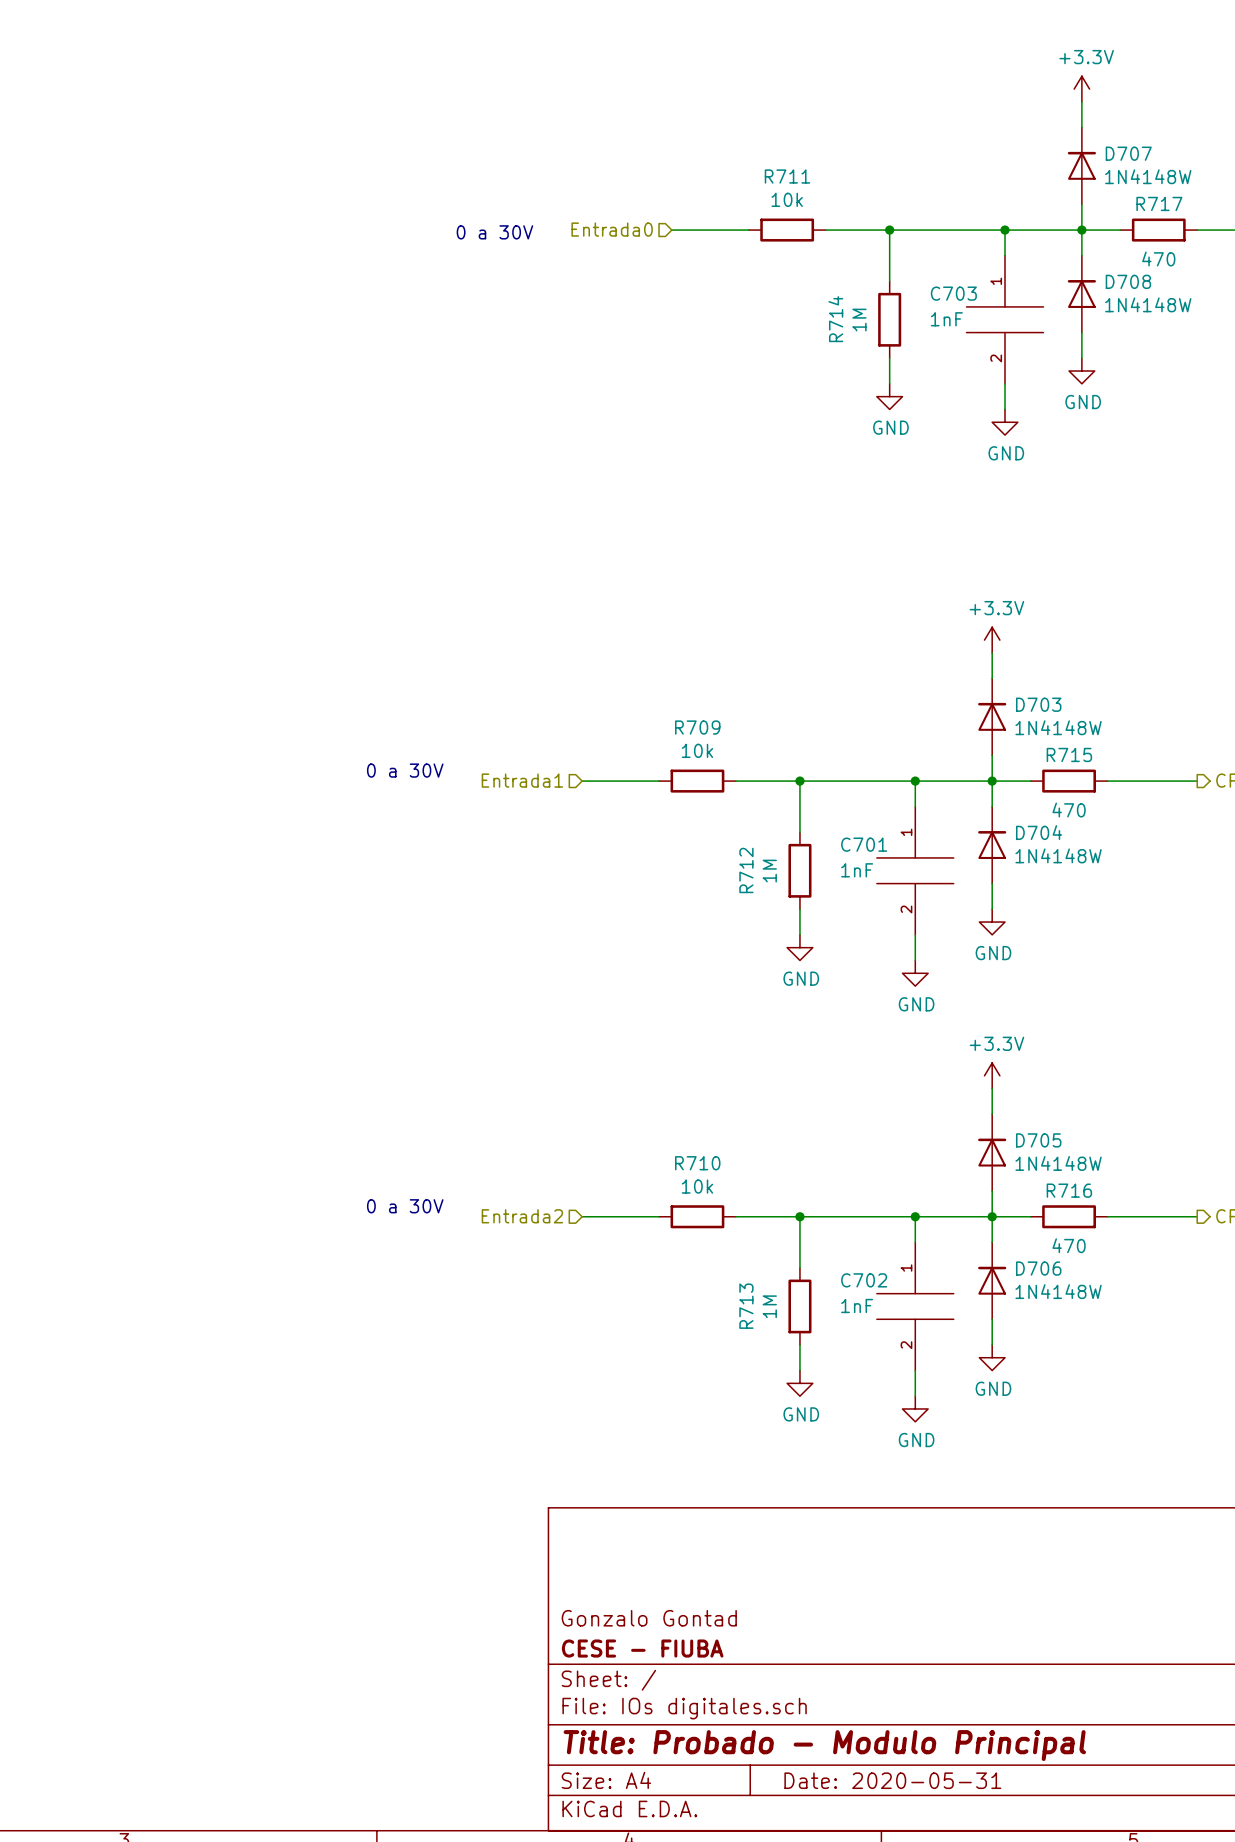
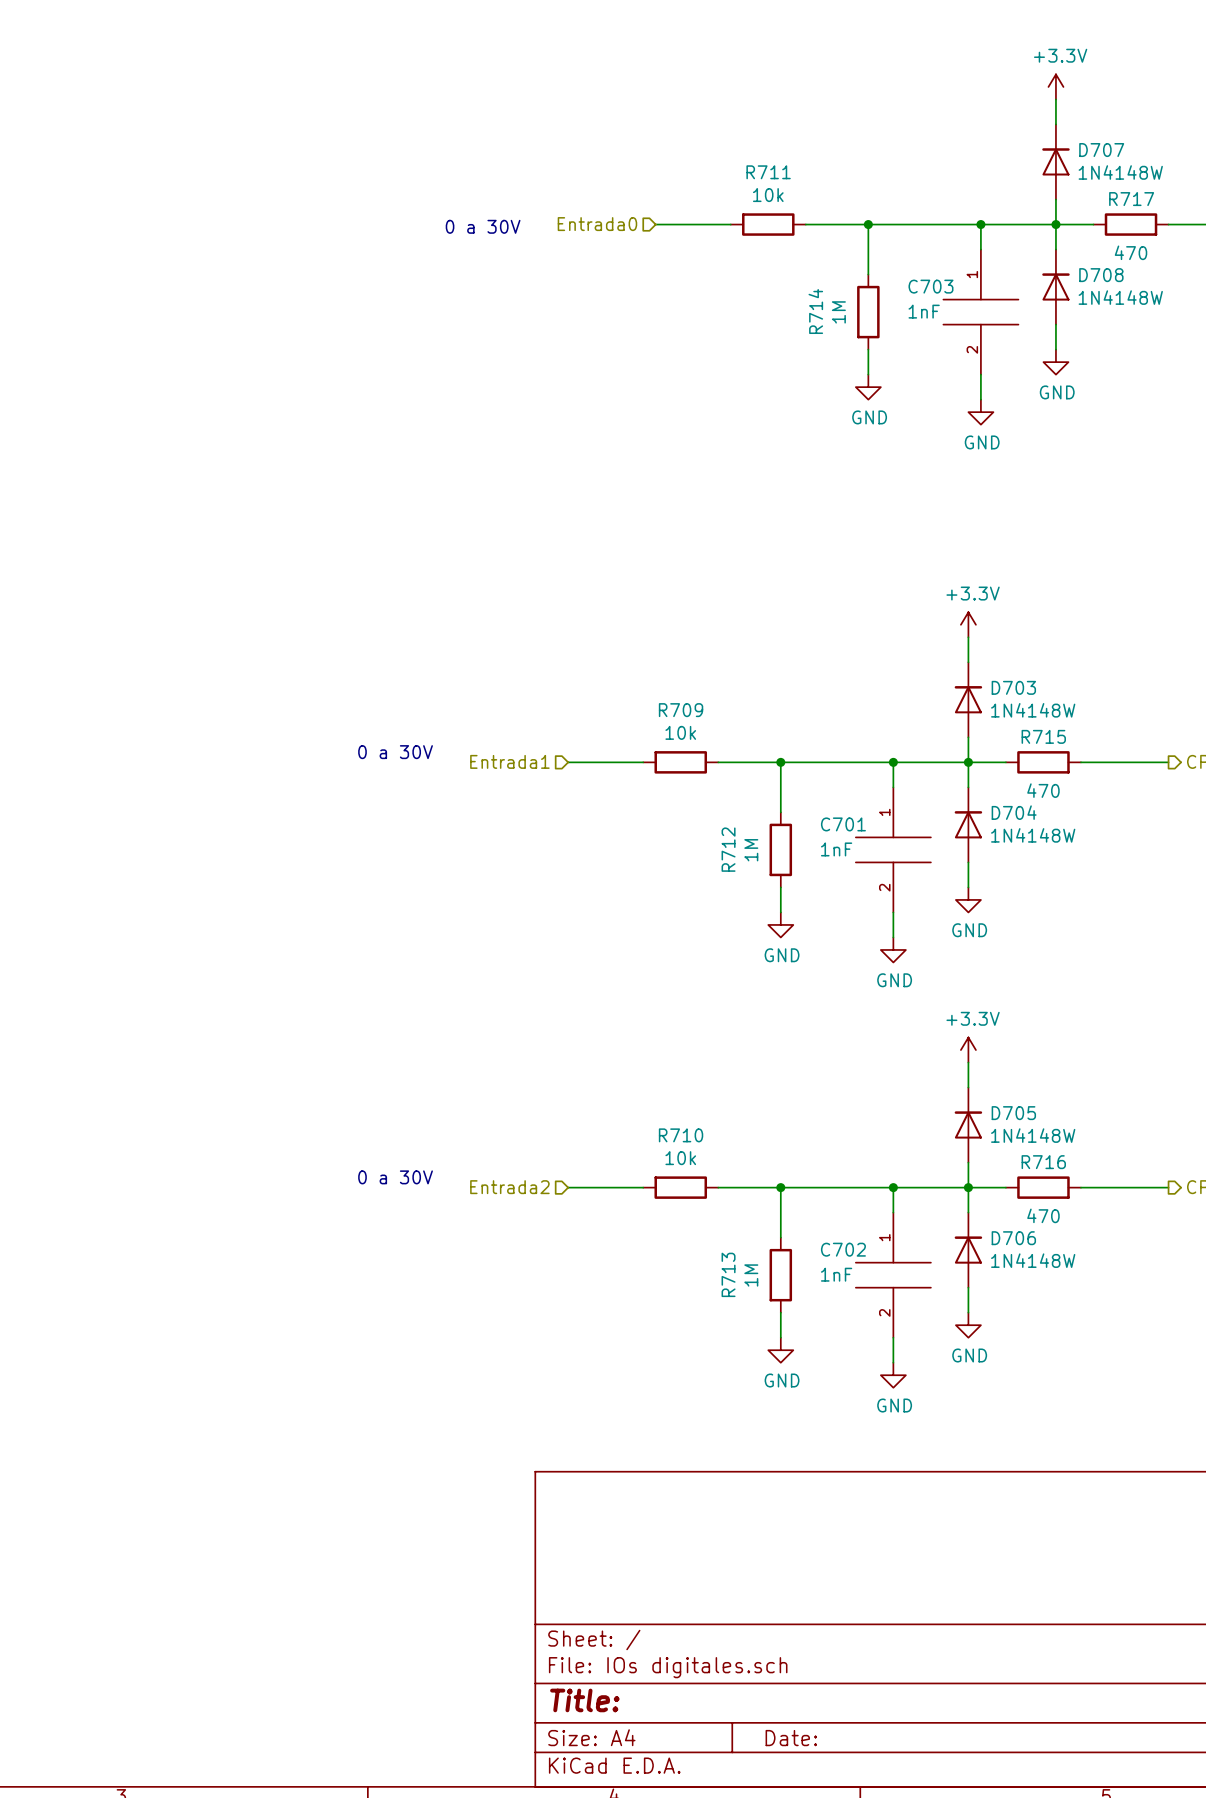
title block: Gonzalo Gontad (649, 1618) -> none
title block: CESE - FIUBA (642, 1648) -> none
title block: Title: Probado - Modulo Principal (824, 1745) -> Title: (584, 1700)
title block: Date: 2020-05-31 (892, 1780) -> Date: (791, 1738)

